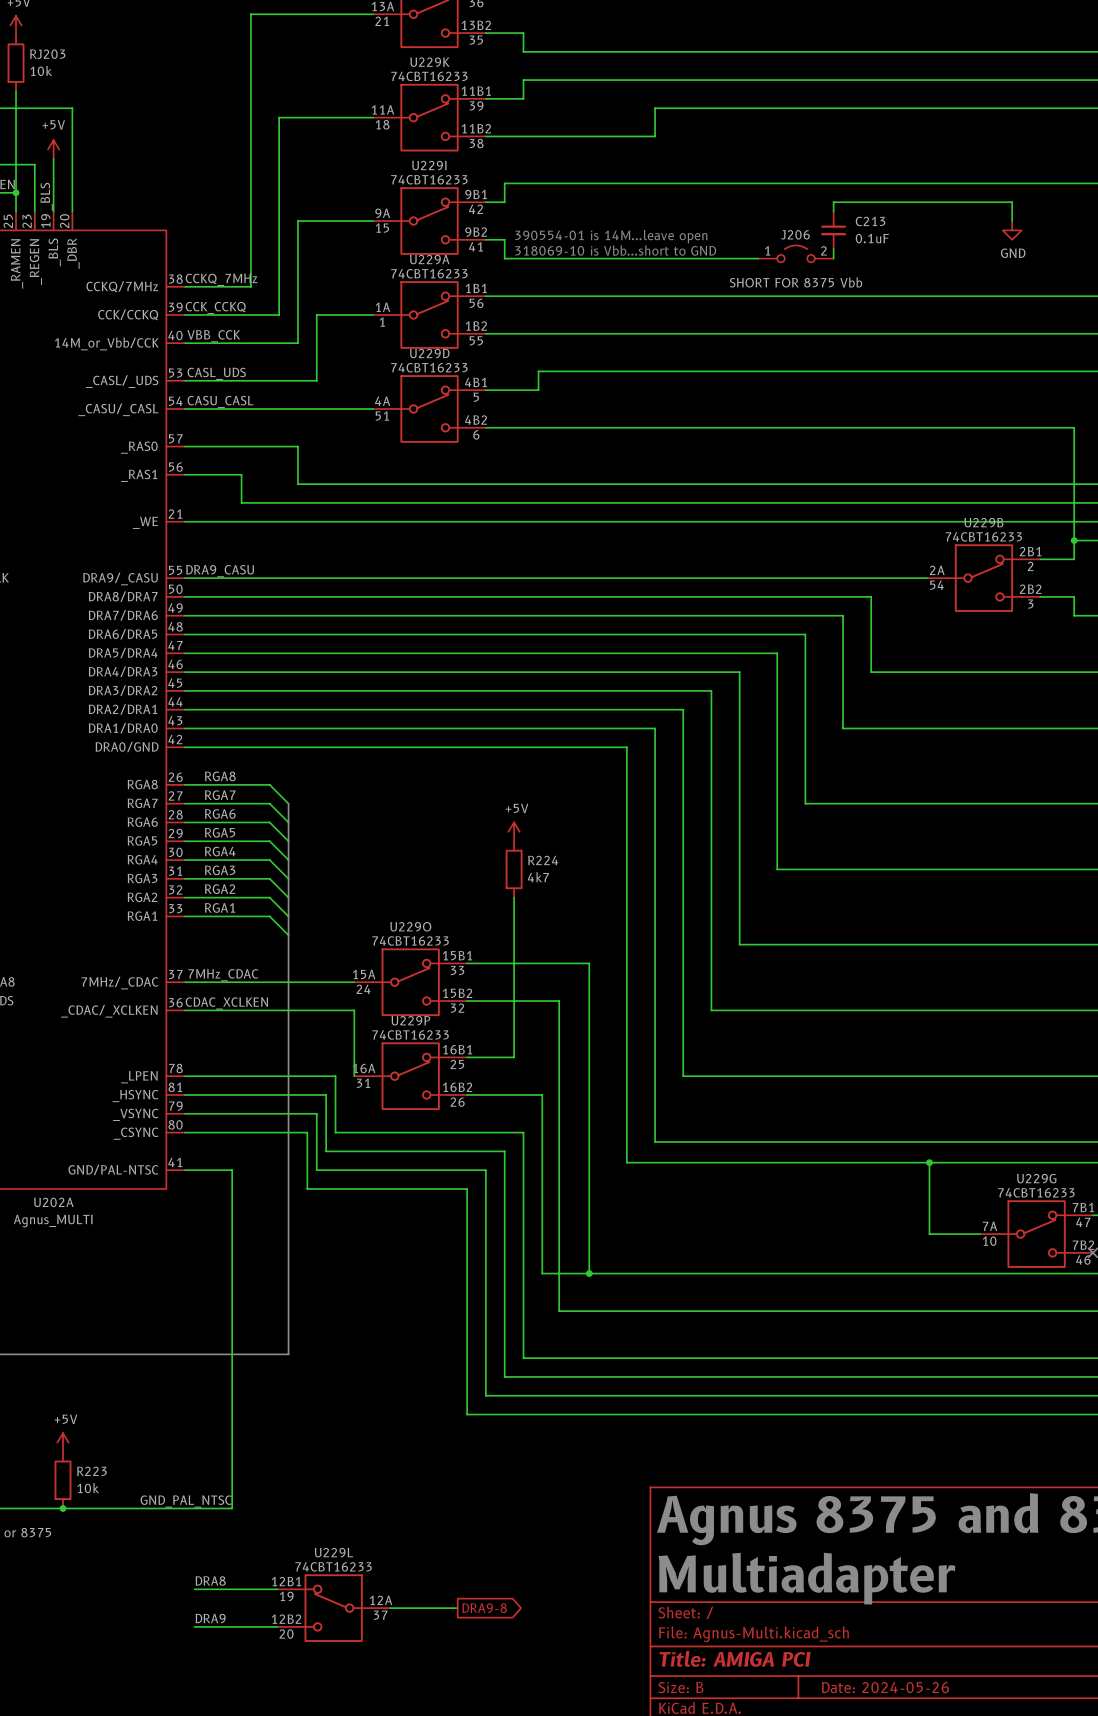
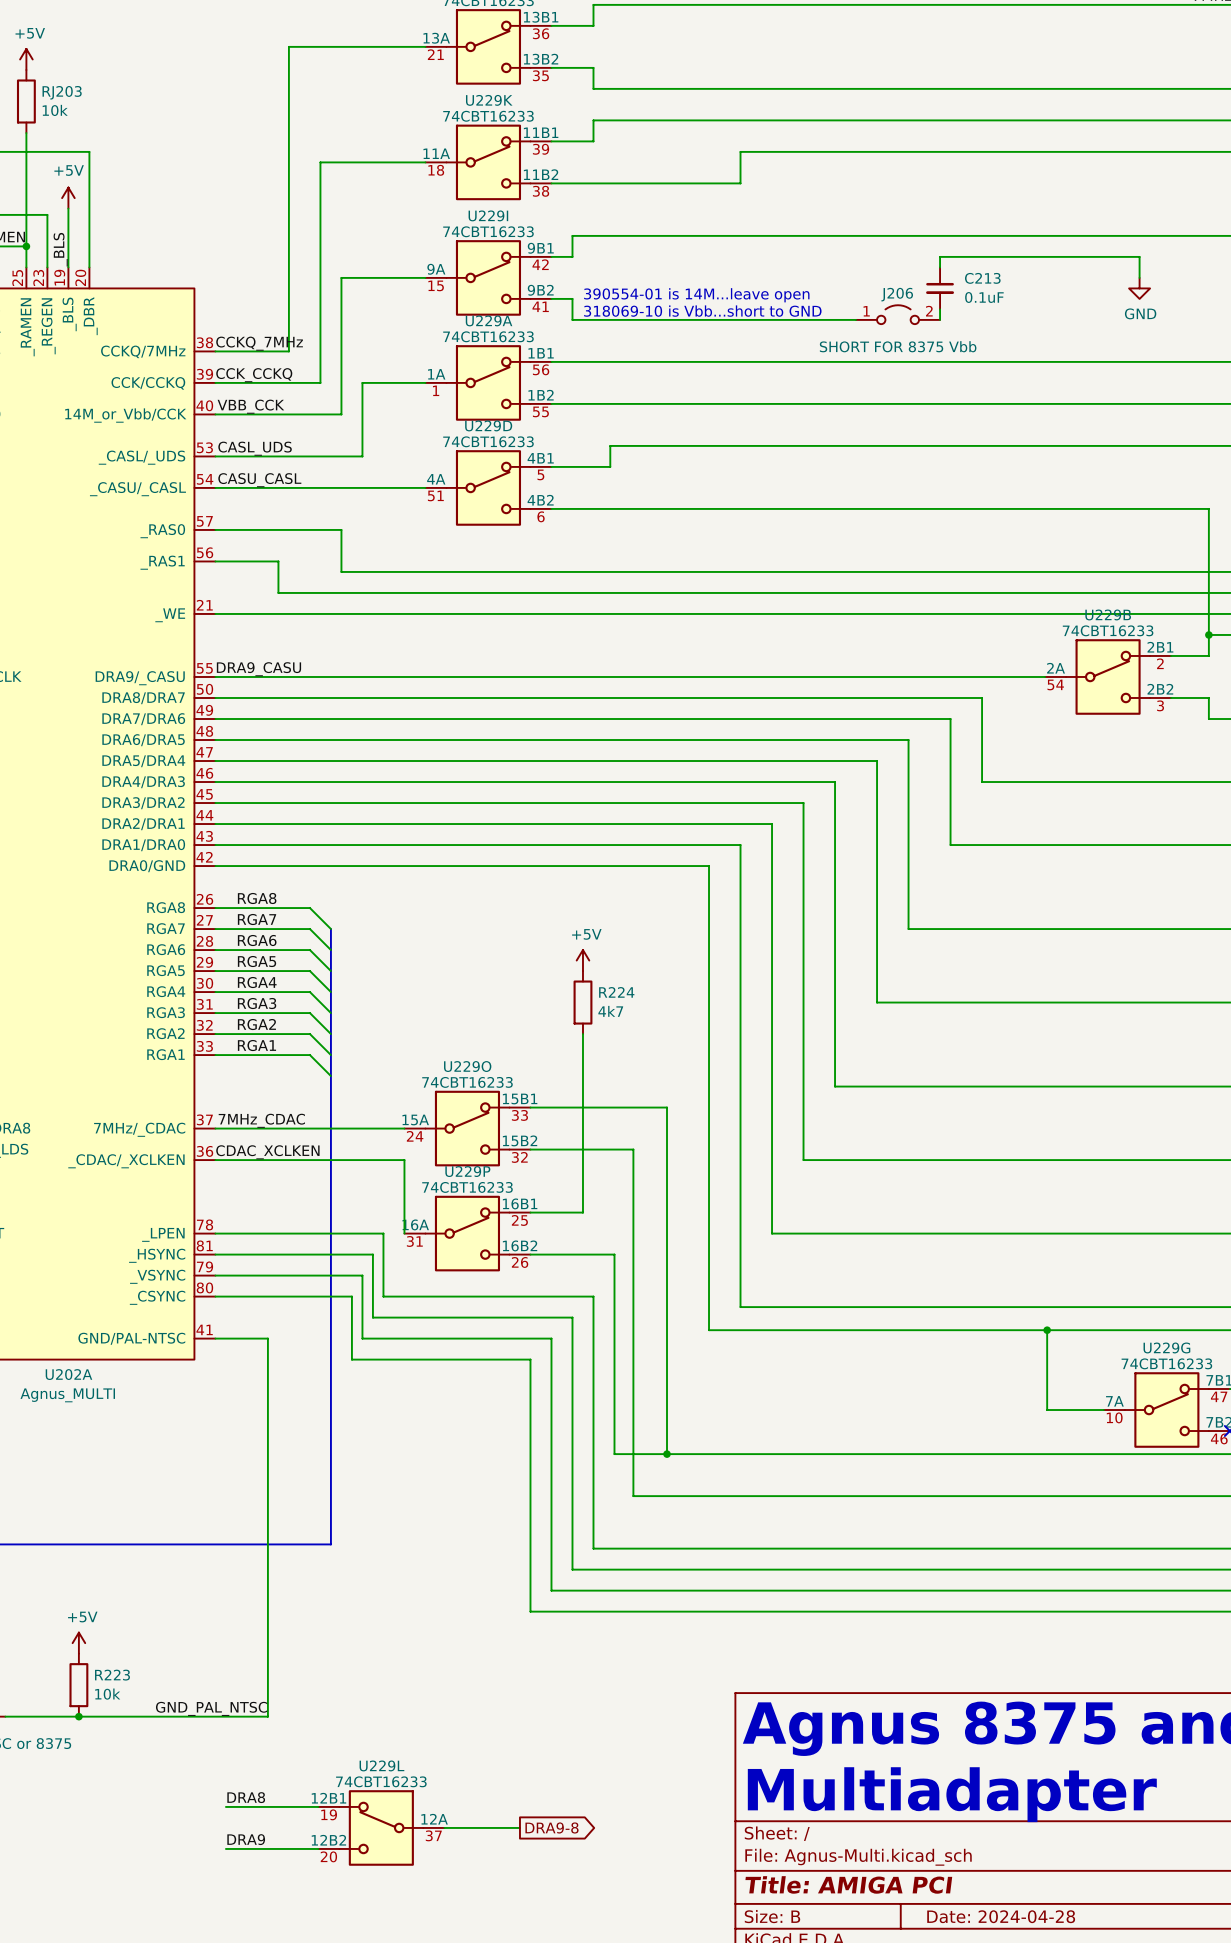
title block: Date: 2024-05-26 (885, 1687) -> Date: 2024-04-28 (1001, 1916)

